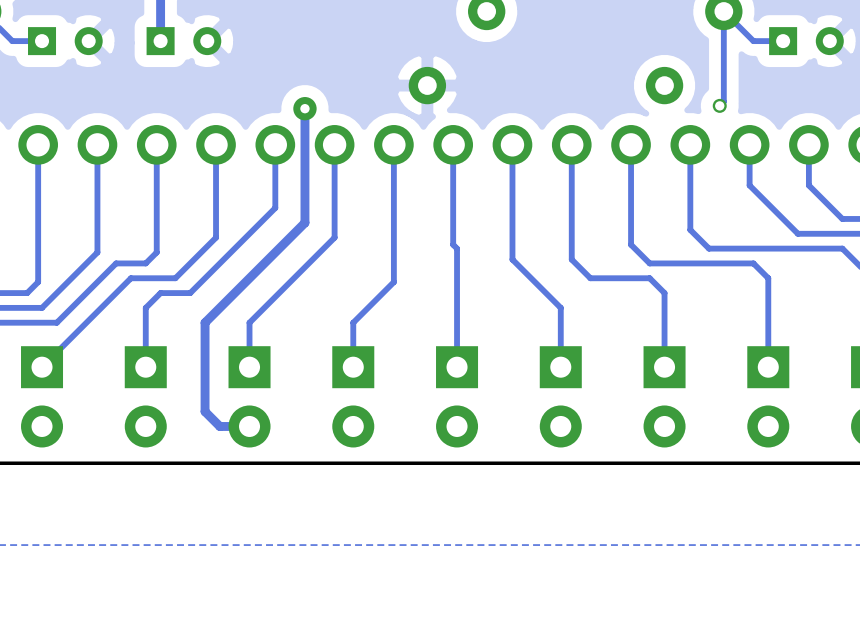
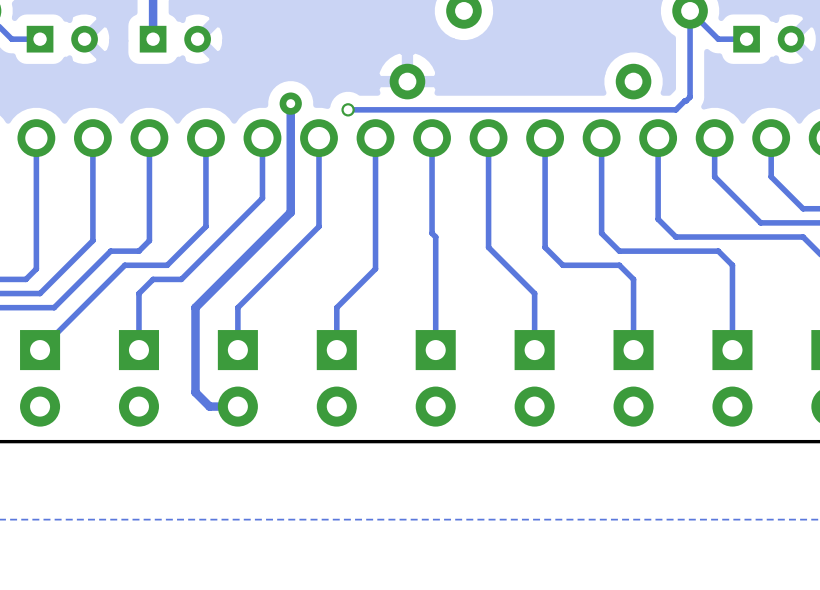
track: none -> (686, 100) (675, 109) (348, 109)
via: (719, 105) -> none
via: none -> (348, 109)

